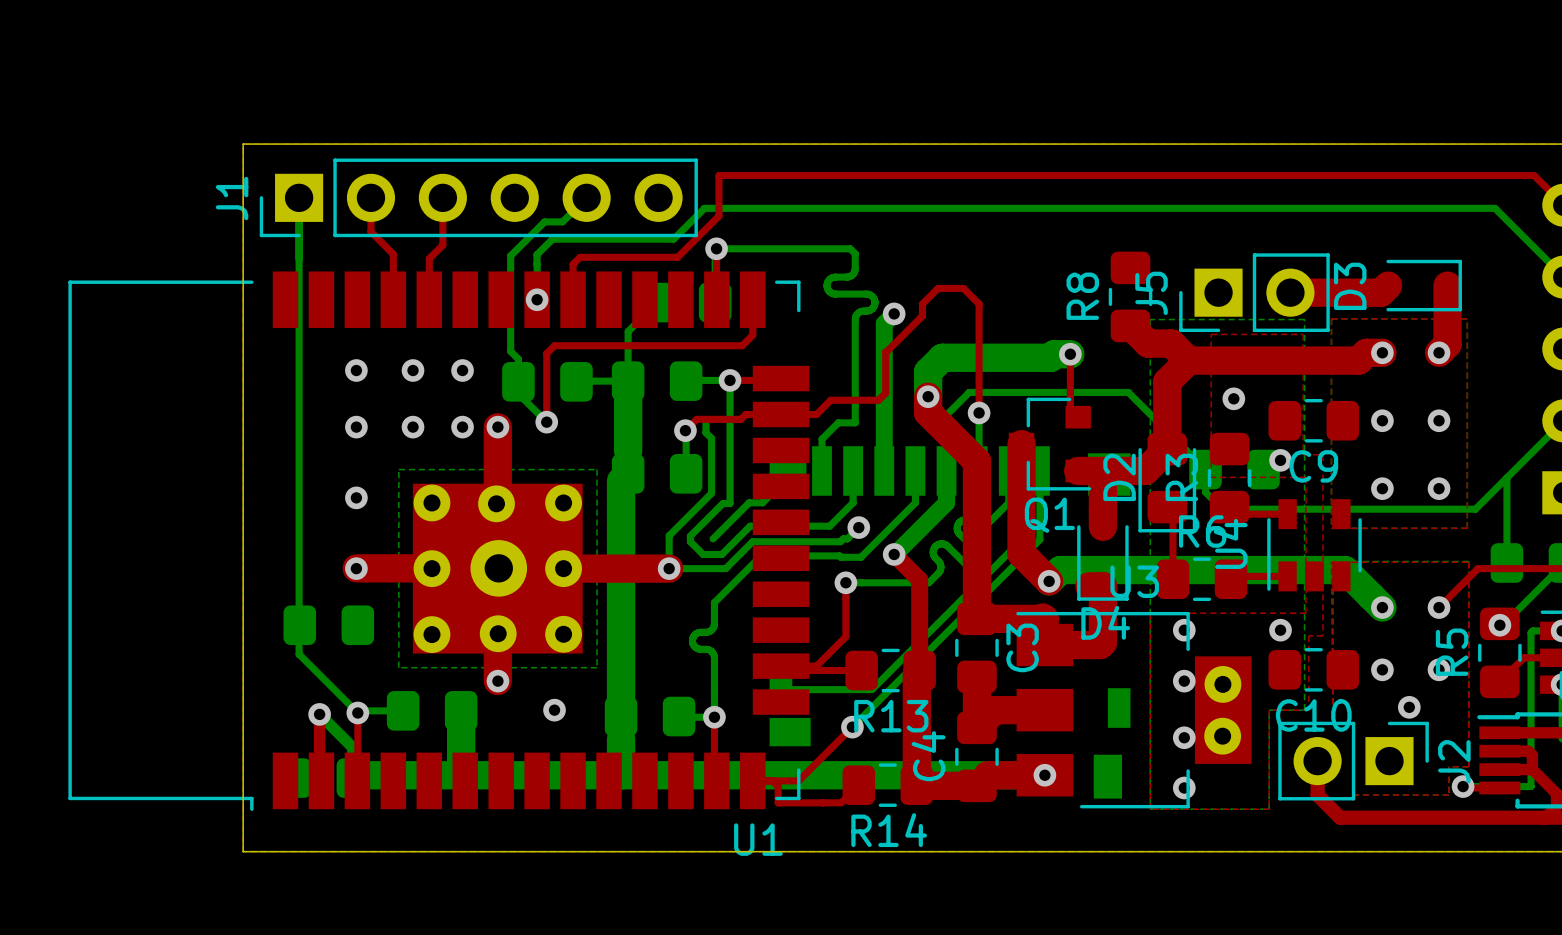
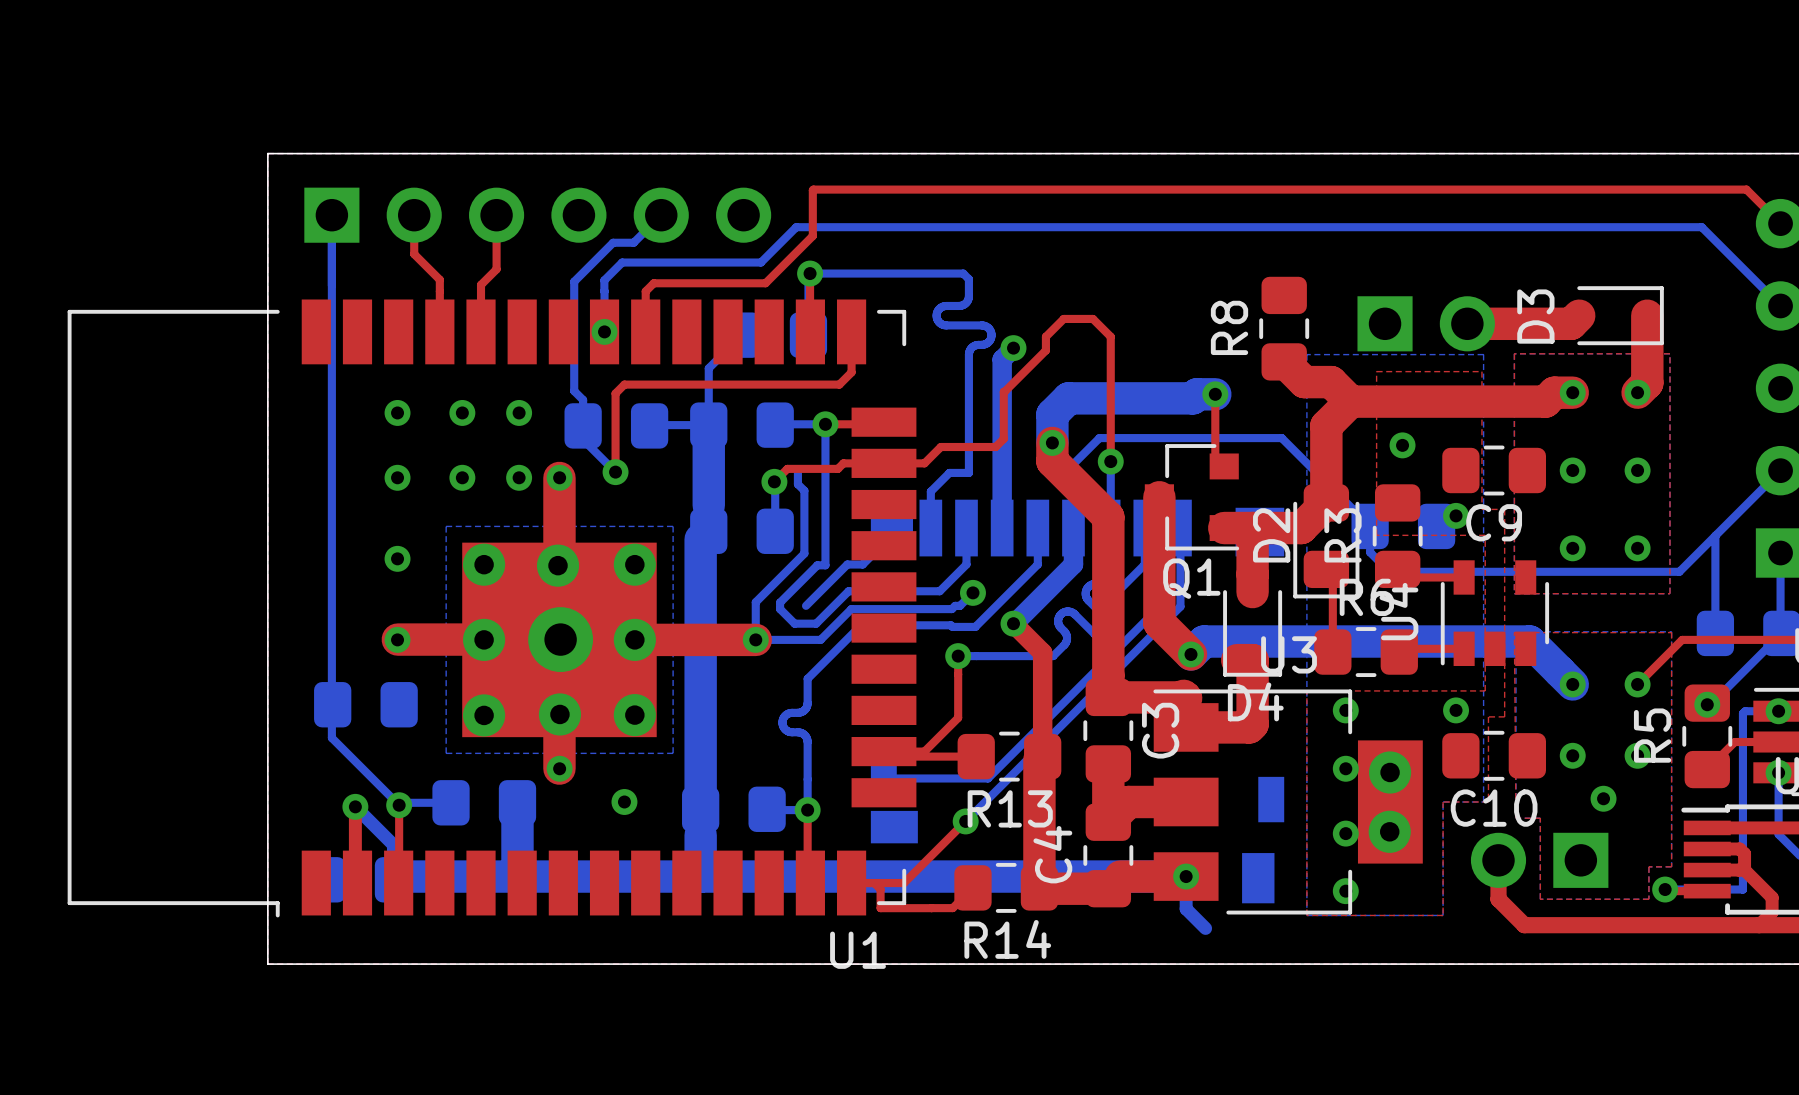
J1 side: top (478, 197) -> bottom (537, 215)
J5 side: top (1254, 292) -> bottom (1426, 323)
J2 side: top (1353, 761) -> bottom (1539, 860)
bottom track: none -> (1186, 876) (1186, 908) (1205, 928)

